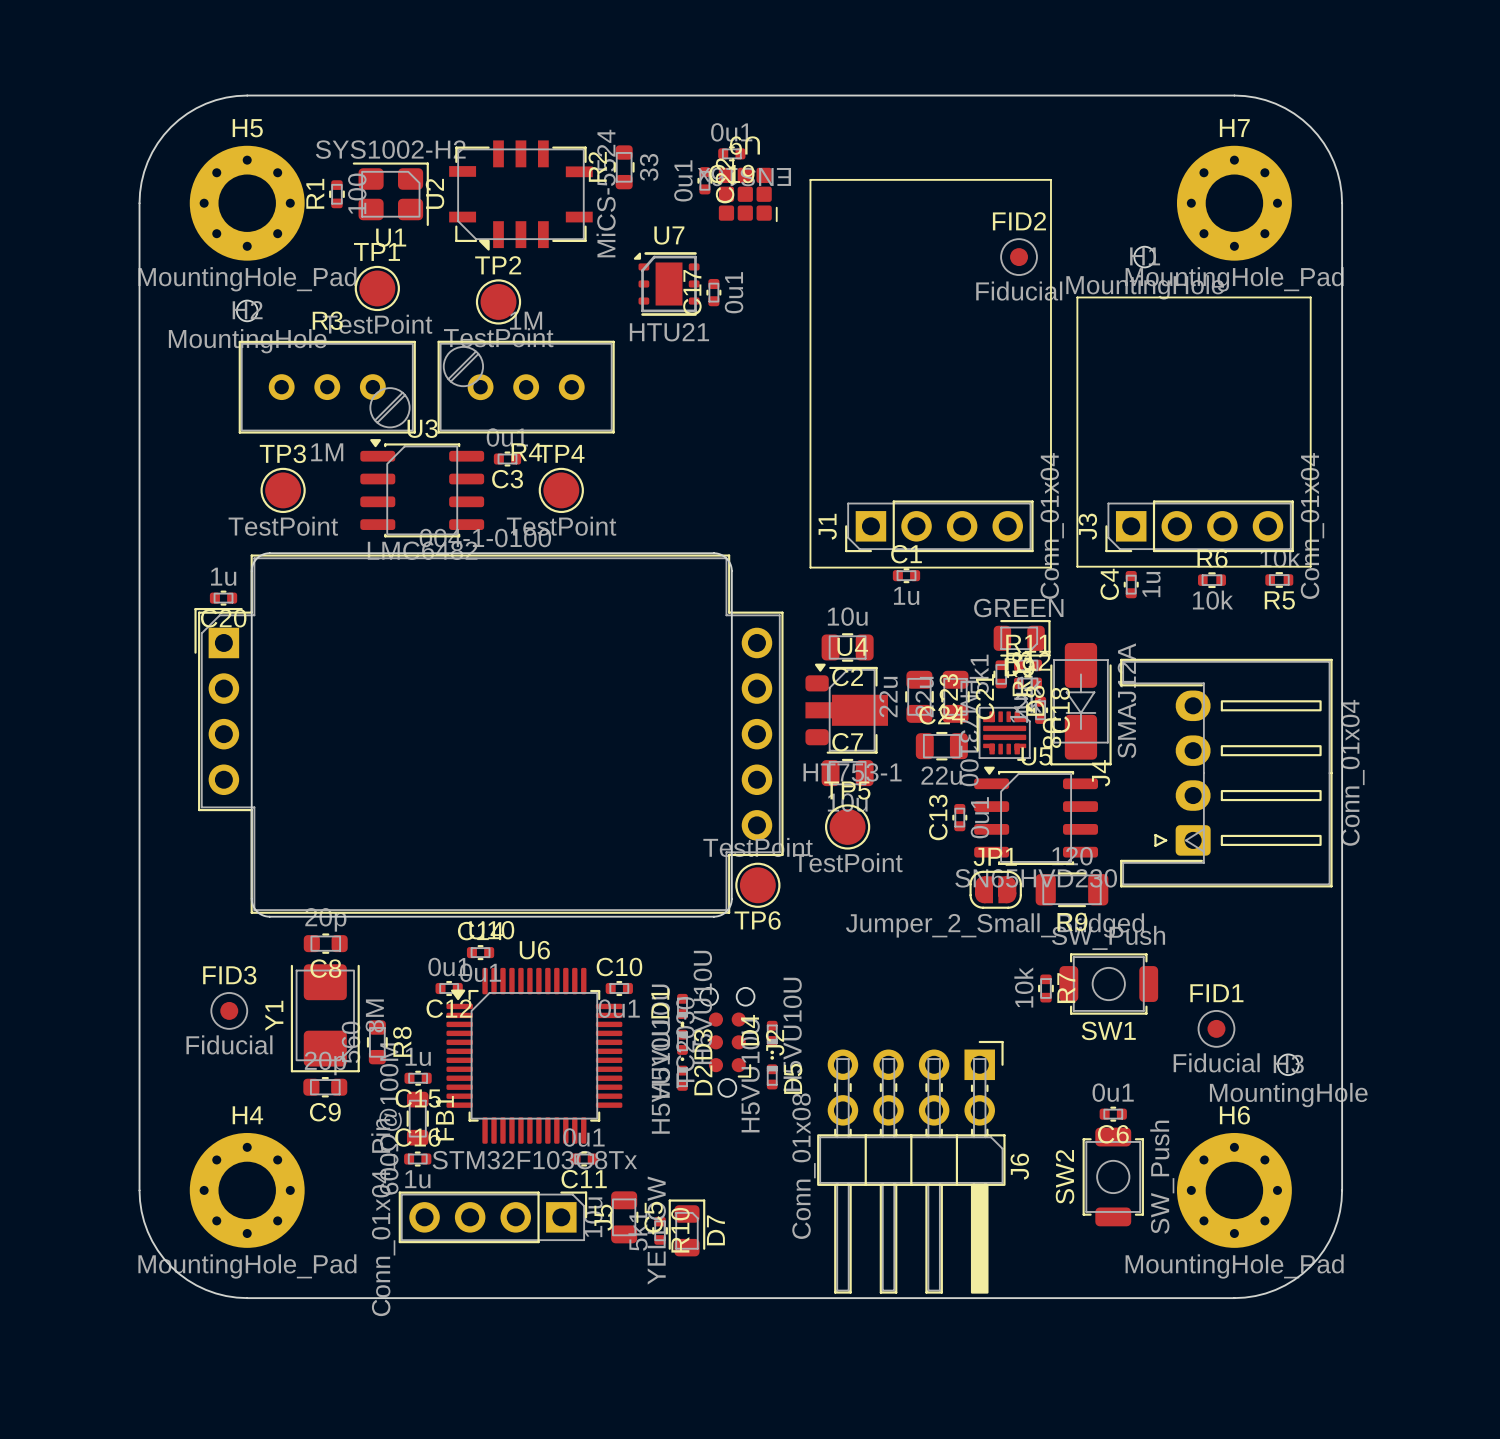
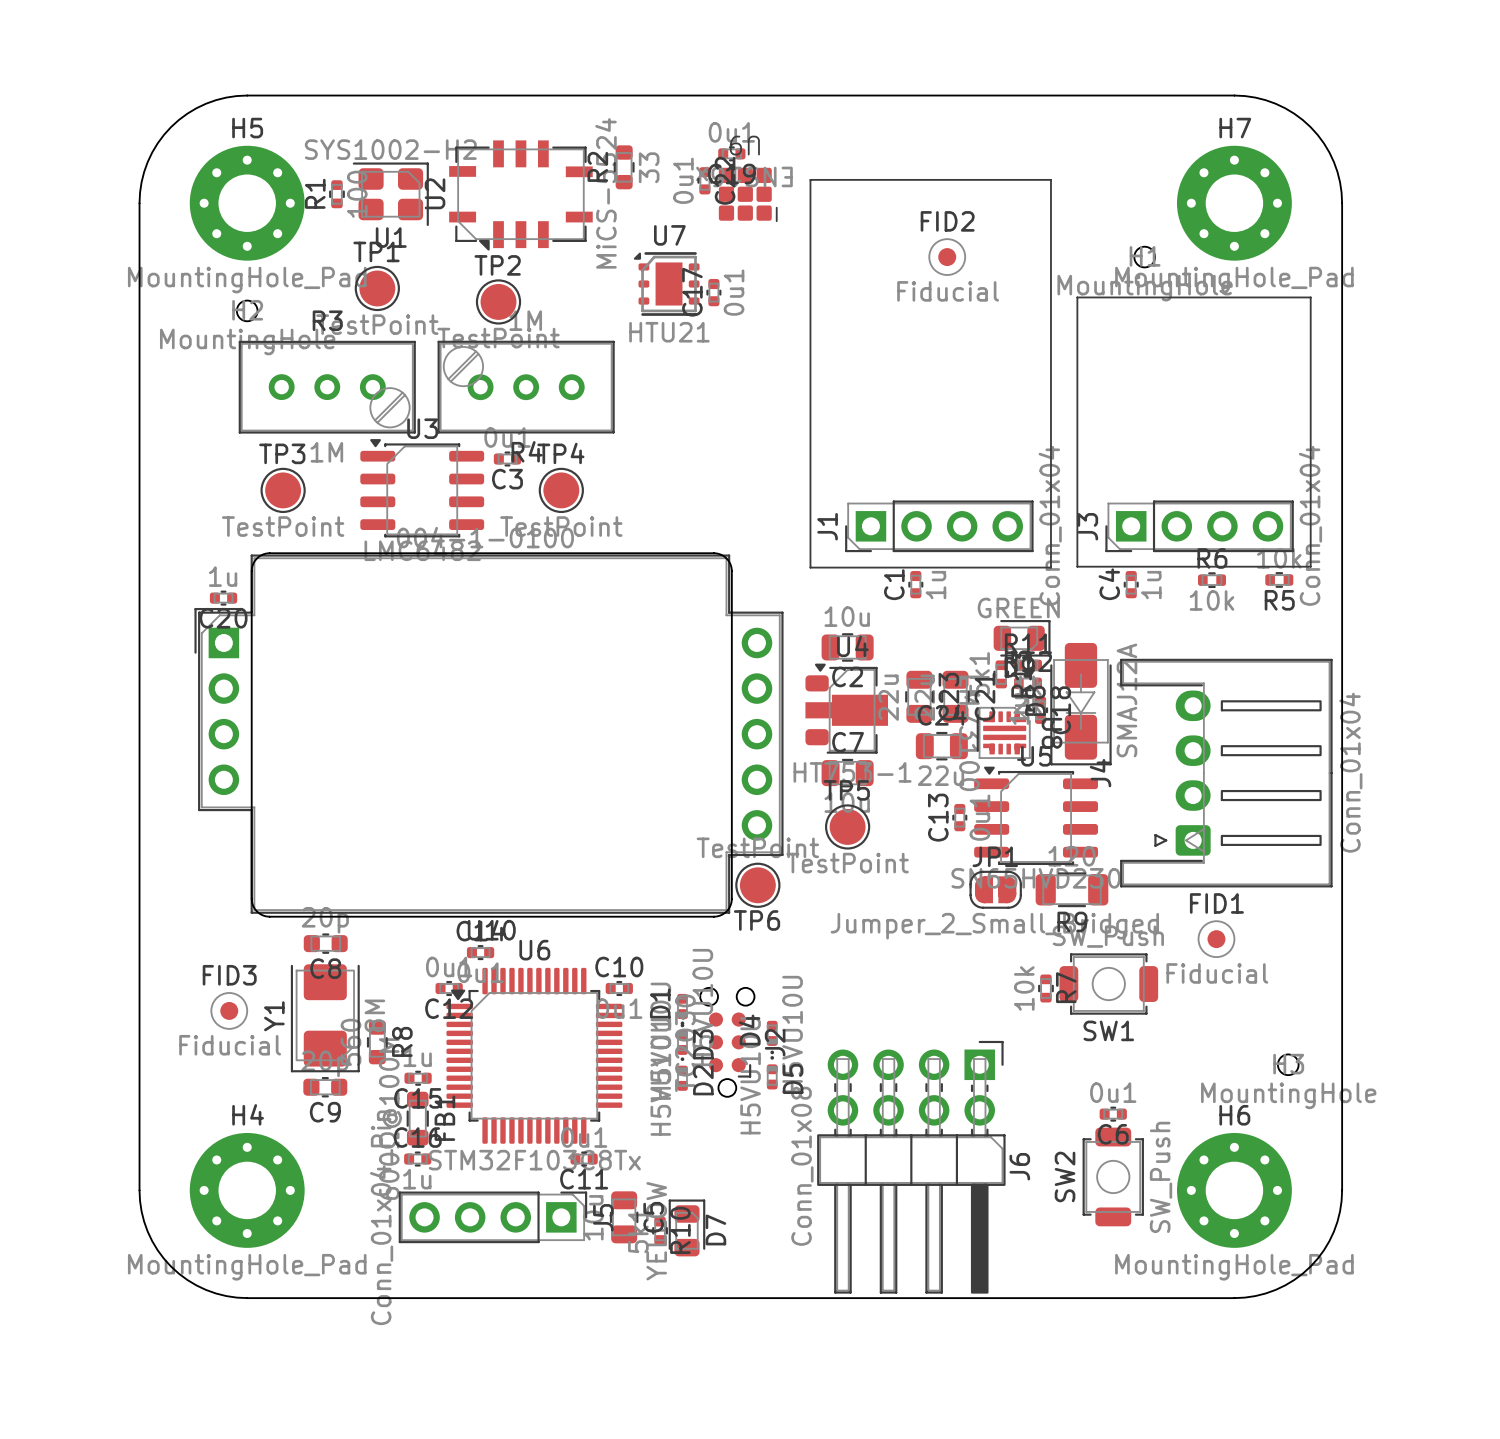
FID2 position: (1019, 257) -> (947, 257)
C1 rotation: 0° (906, 575) -> 90° clockwise (915, 584)
FID1 position: (1216, 1028) -> (1216, 939)

